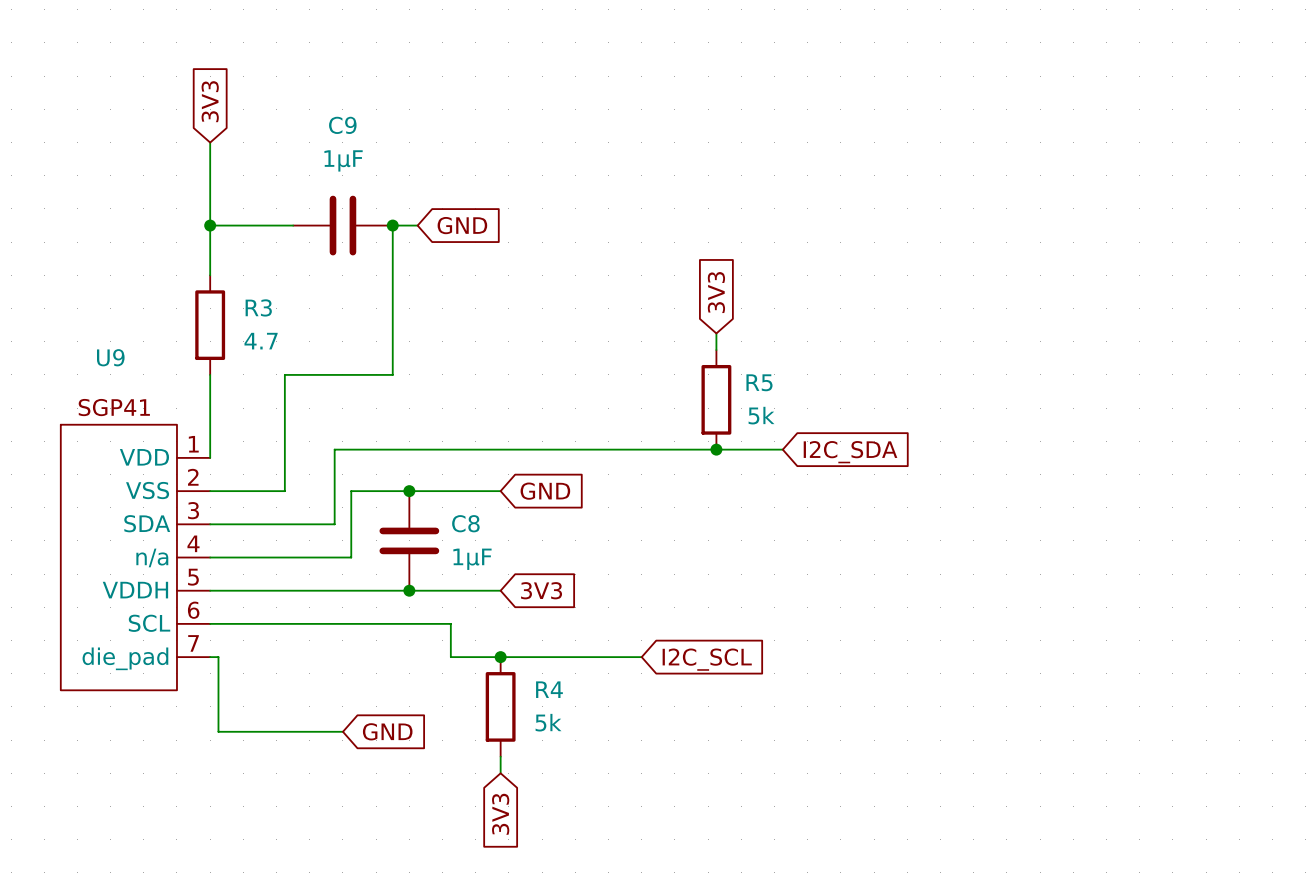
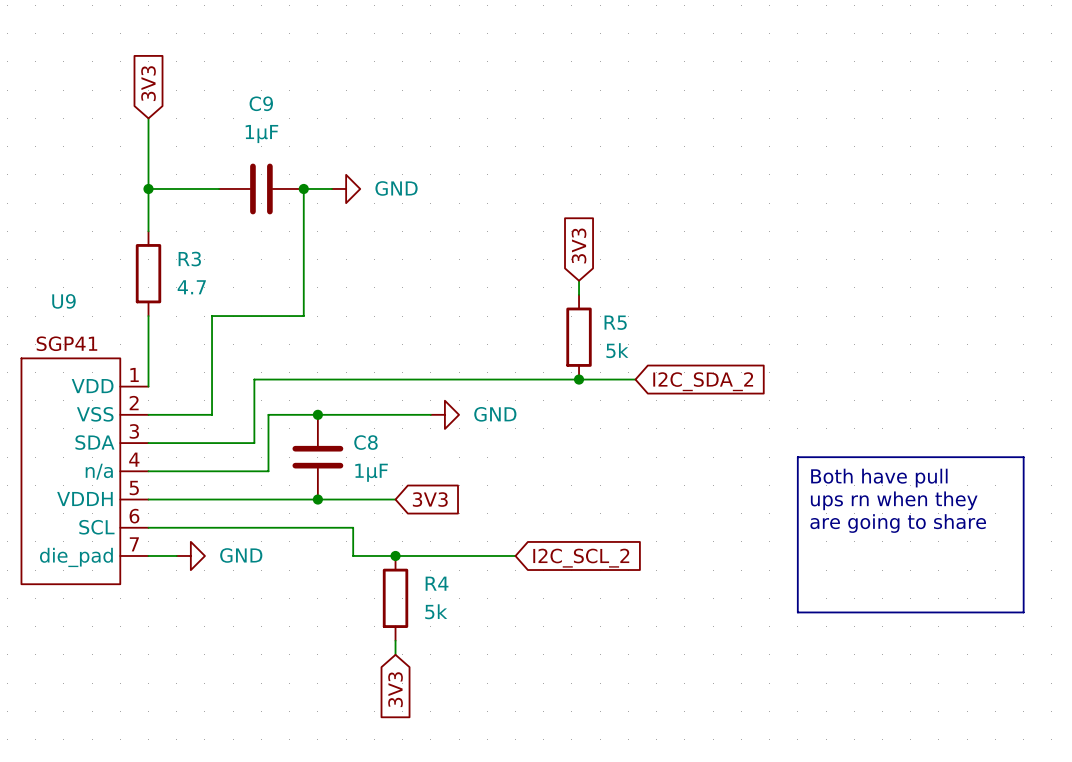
wire: none -> (324, 188) (332, 188)
power symbol: none -> GND (346, 188)
global label: GND (462, 225) -> none
global label: I2C_SDA (850, 452) -> I2C_SDA_2 (703, 381)
wire: none -> (395, 414) (430, 414)
global label: GND (545, 491) -> none
power symbol: none -> GND (444, 414)
line: none -> (797, 457) (1023, 457) (1023, 612) (797, 612) (797, 457)
text: none -> Both have pull (879, 478)
text: none -> ups rn when they (894, 500)
text: none -> are going to share (898, 523)
wire: (218, 657) (218, 731) (342, 731) -> (155, 555) (176, 555)
power symbol: none -> GND (190, 555)
global label: I2C_SCL (707, 659) -> I2C_SCL_2 (581, 558)
global label: GND (387, 731) -> none

